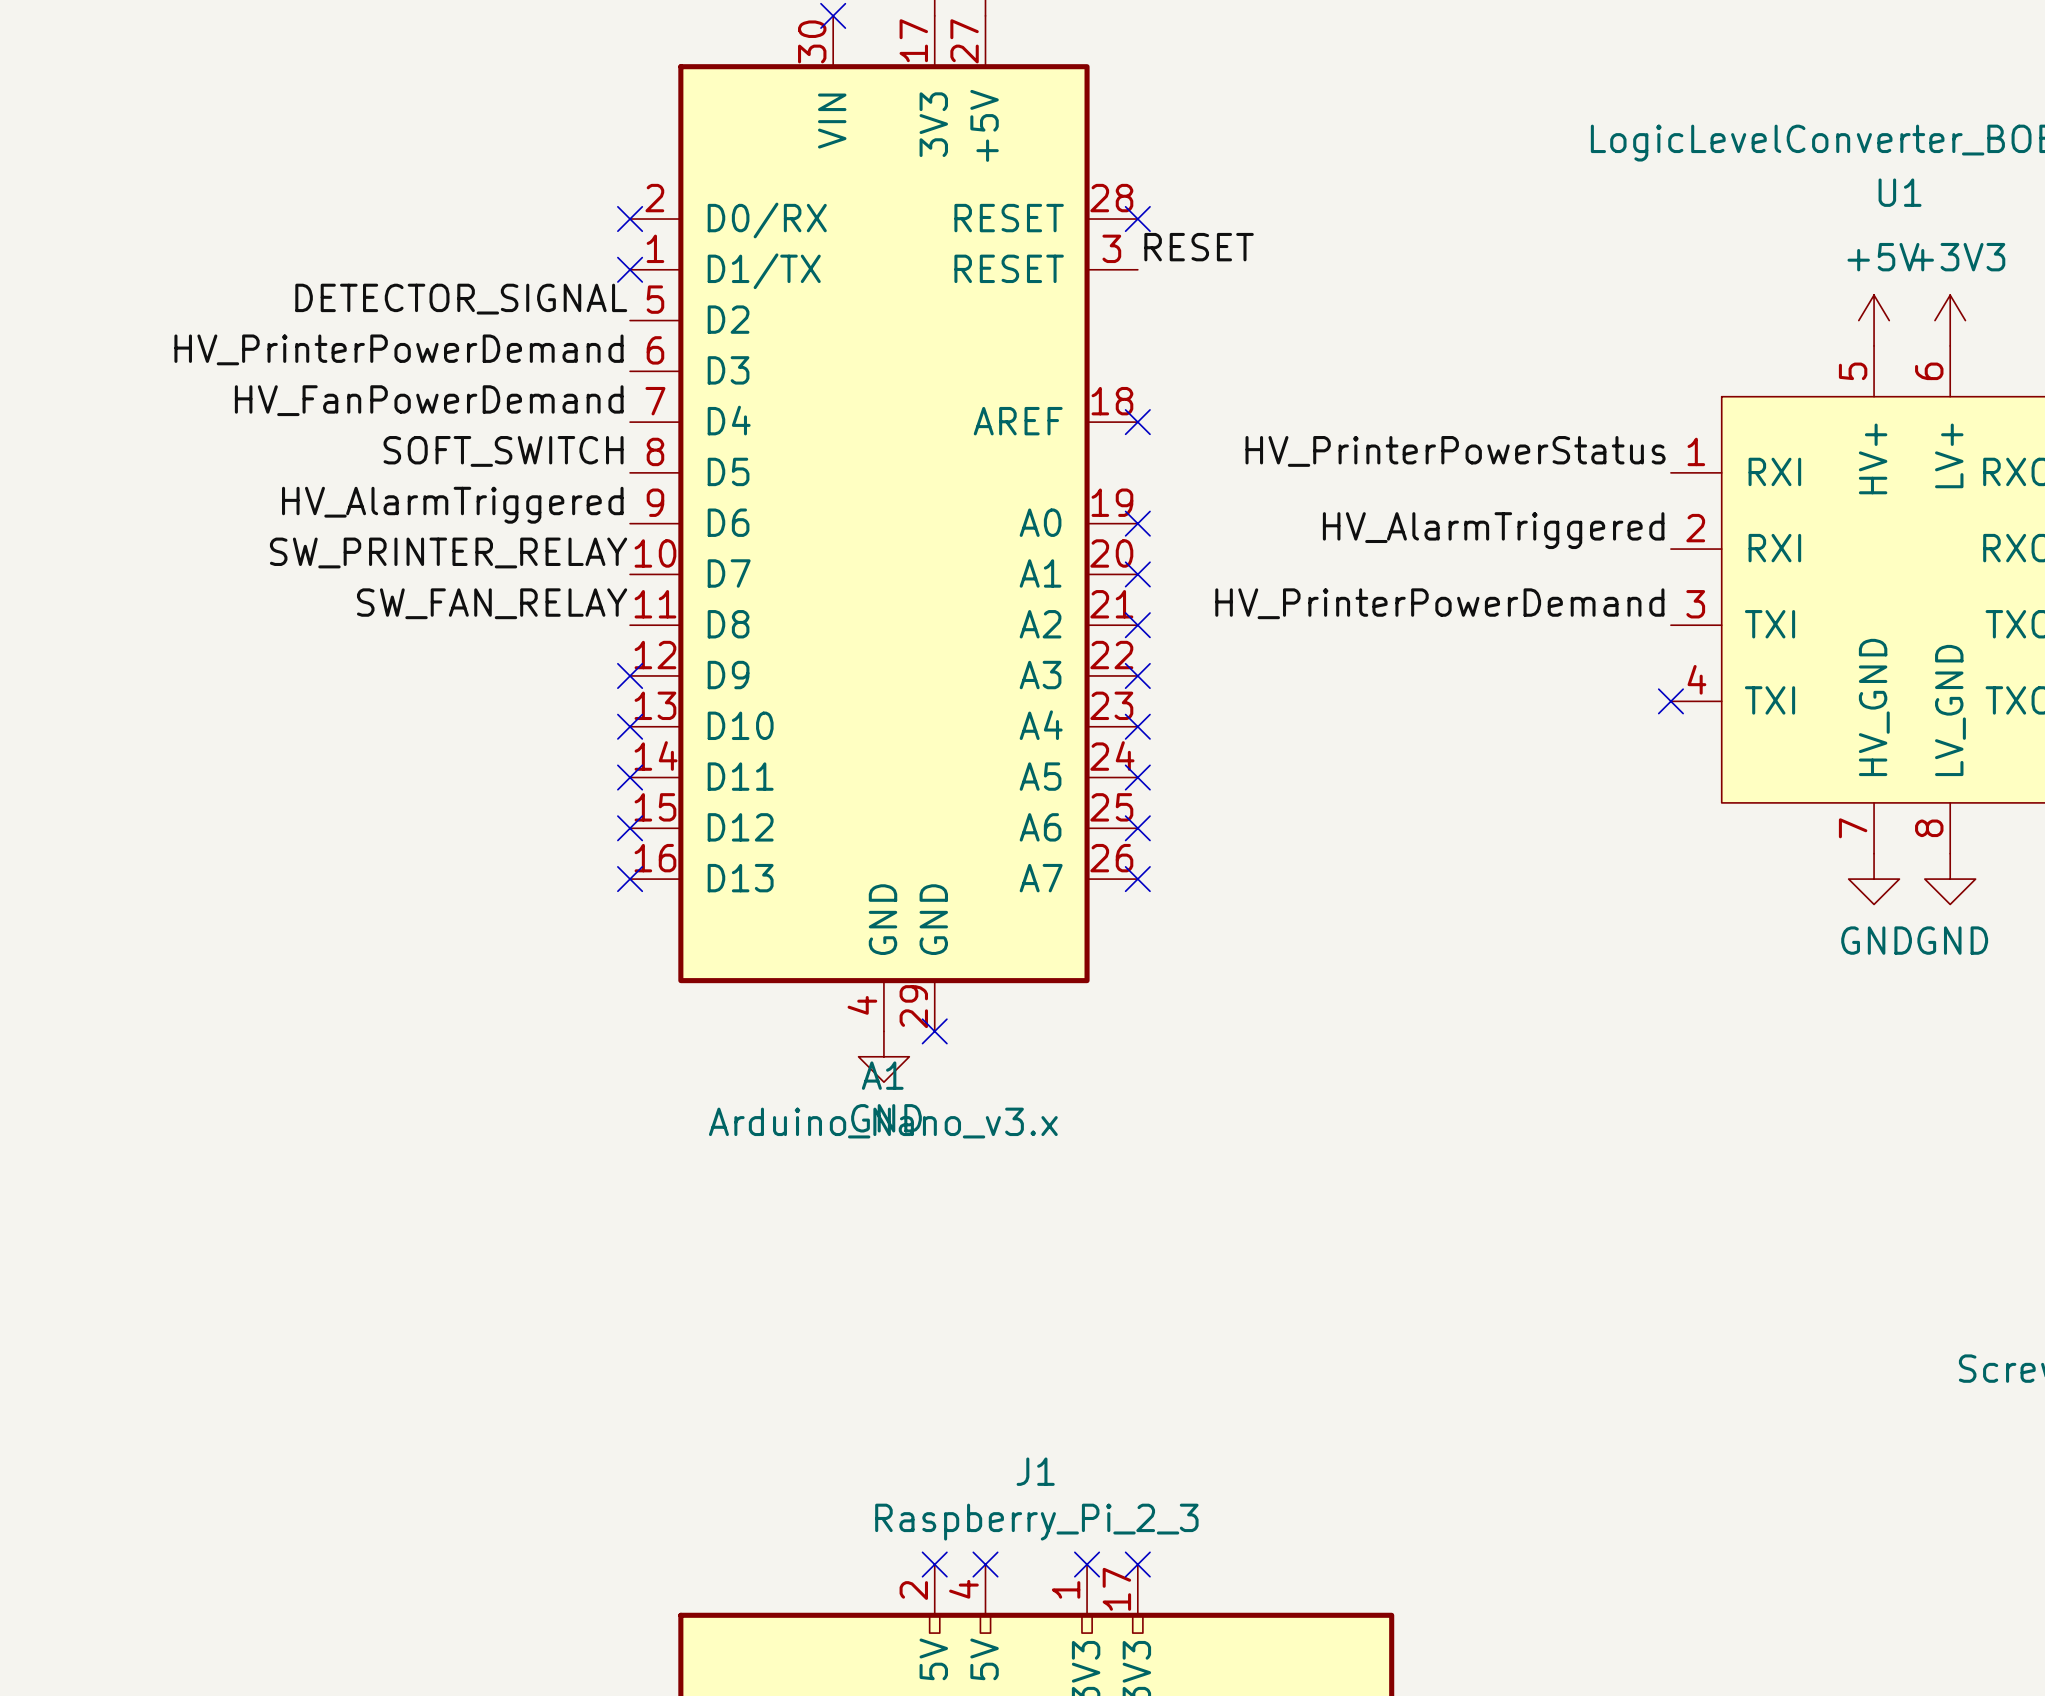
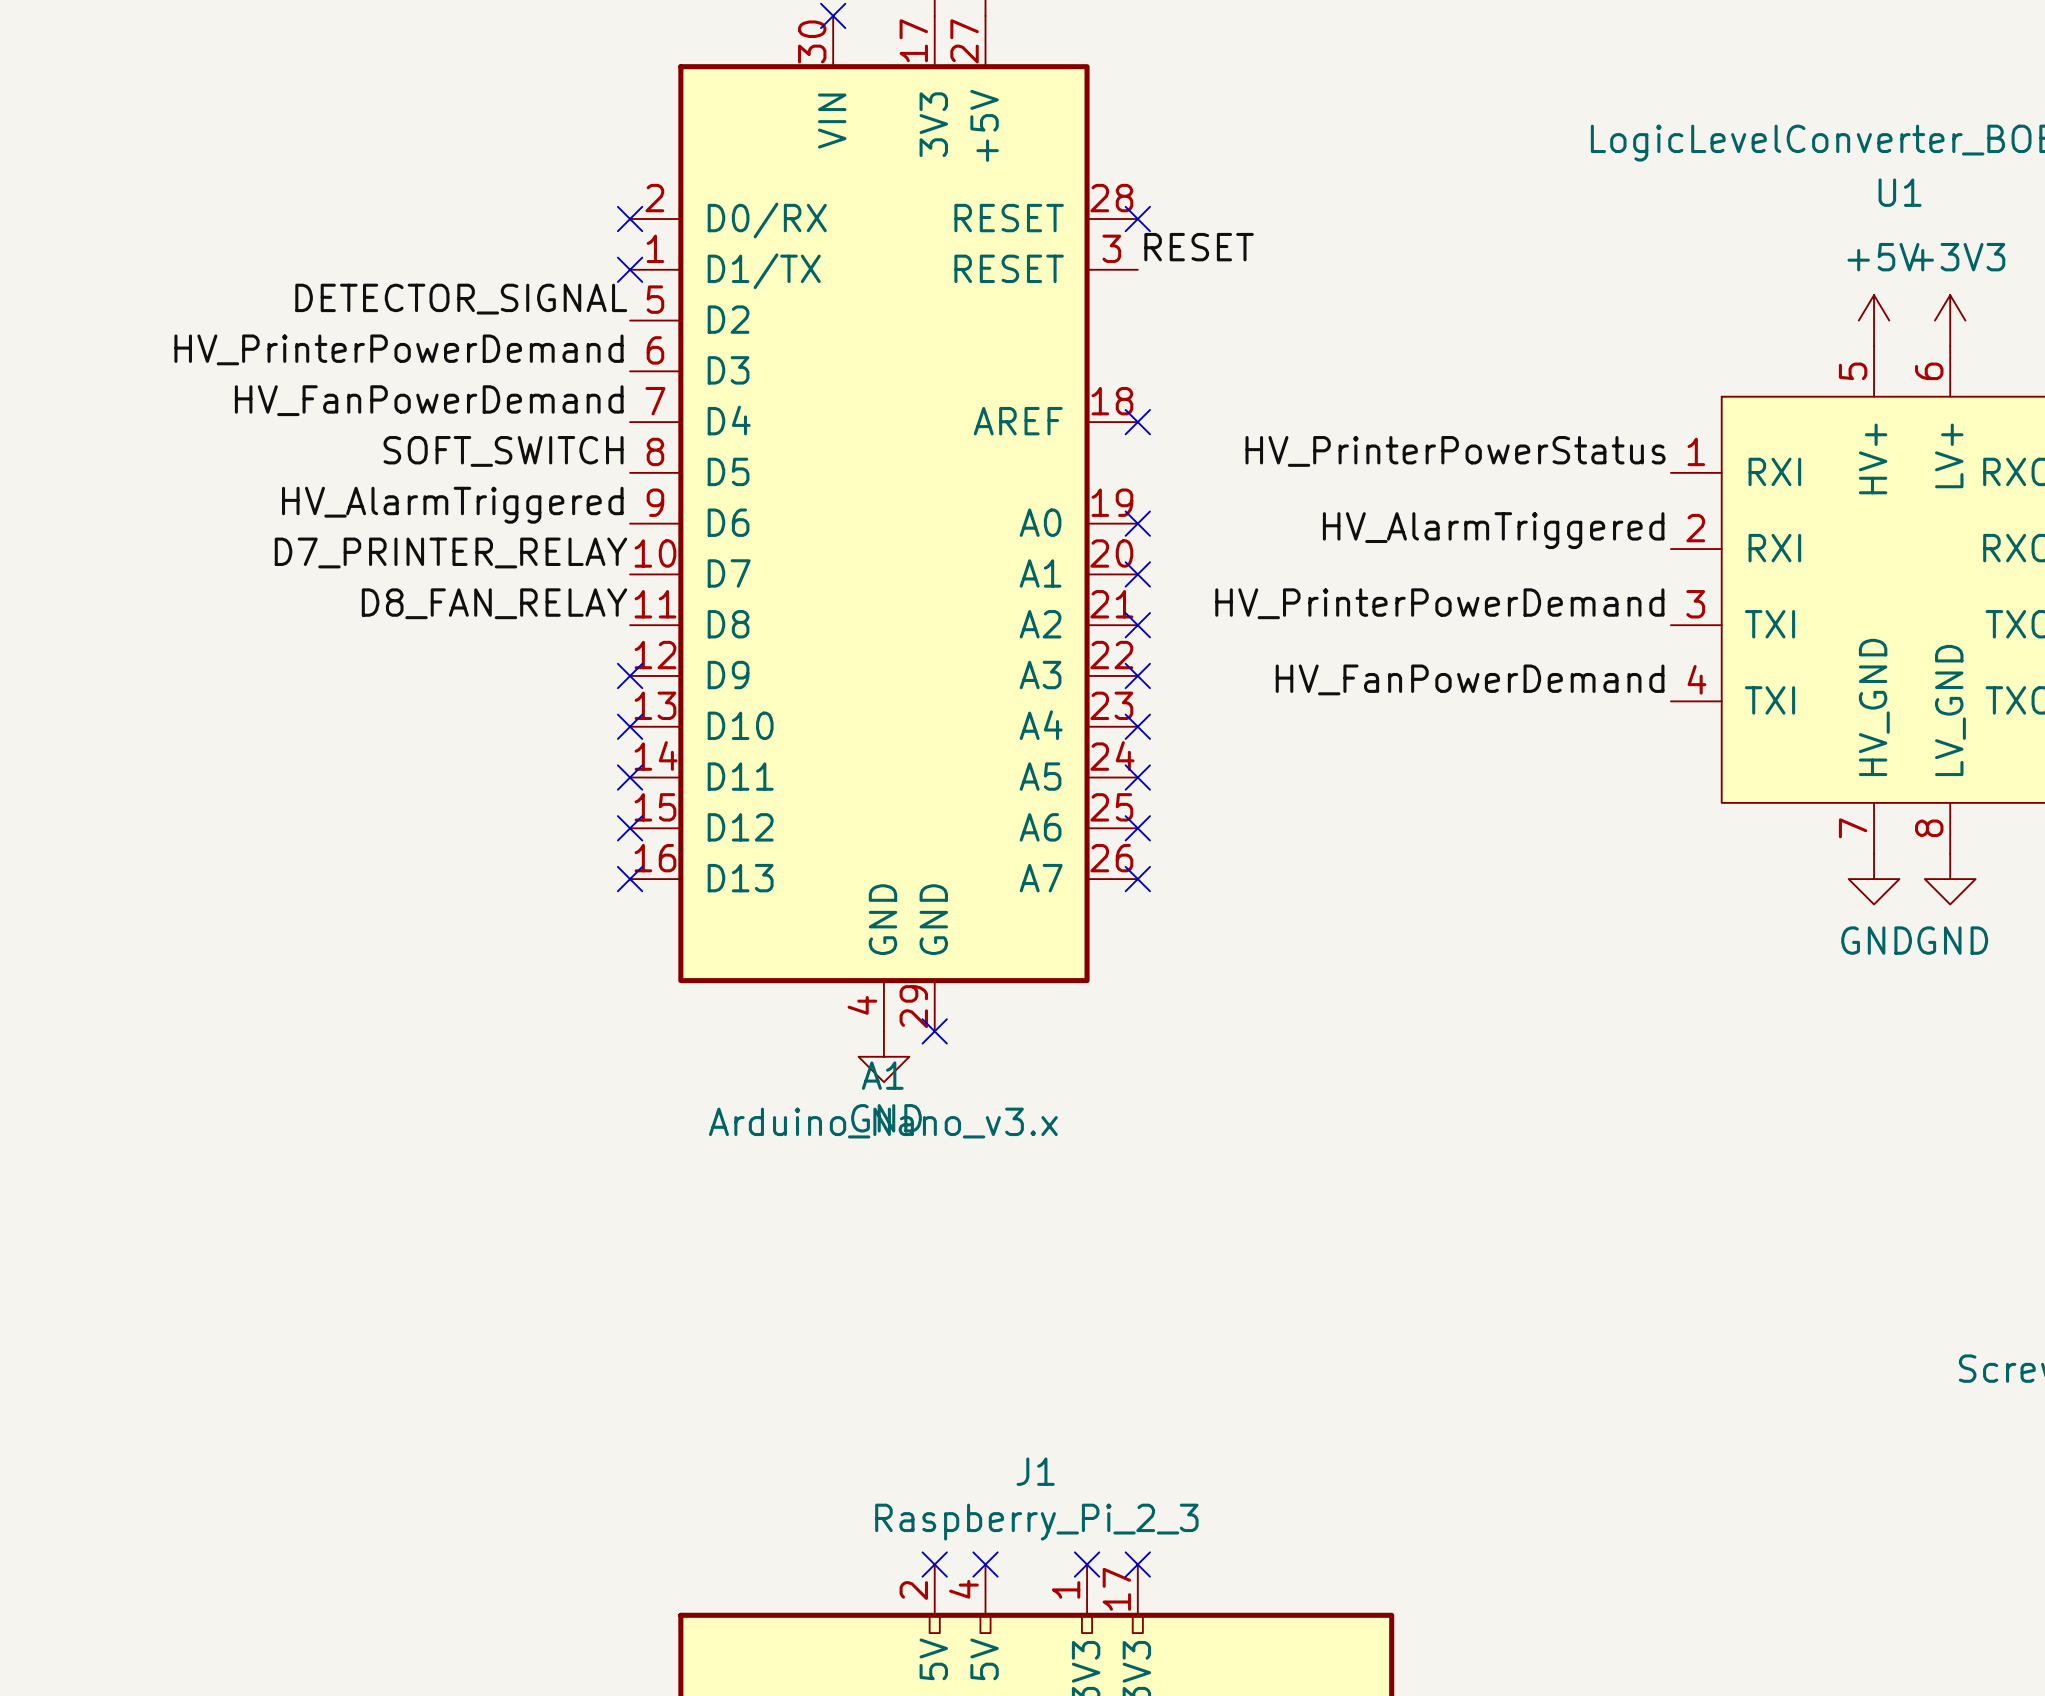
label: SW_PRINTER_RELAY (448, 552) -> D7_PRINTER_RELAY (450, 552)
label: SW_FAN_RELAY (492, 603) -> D8_FAN_RELAY (494, 603)
label: none -> HV_FanPowerDemand (1470, 679)
no-connect mark: (1670, 701) -> none

